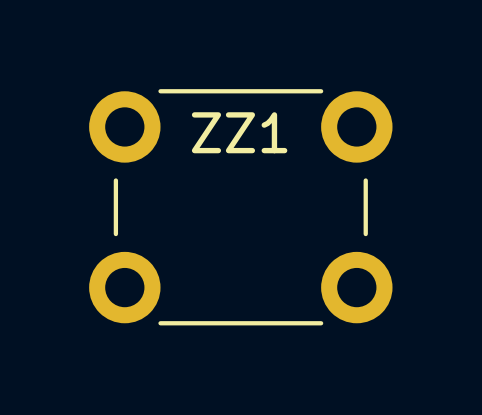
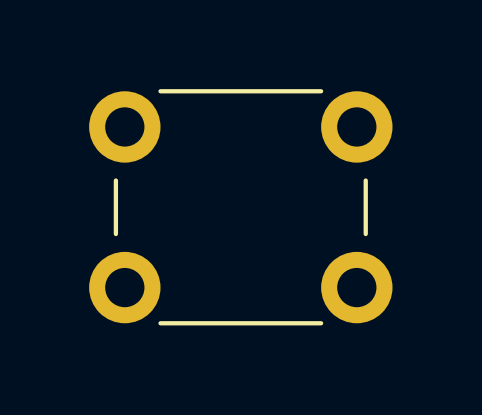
ZZ1 name: ZZ1 (239, 132) -> none

